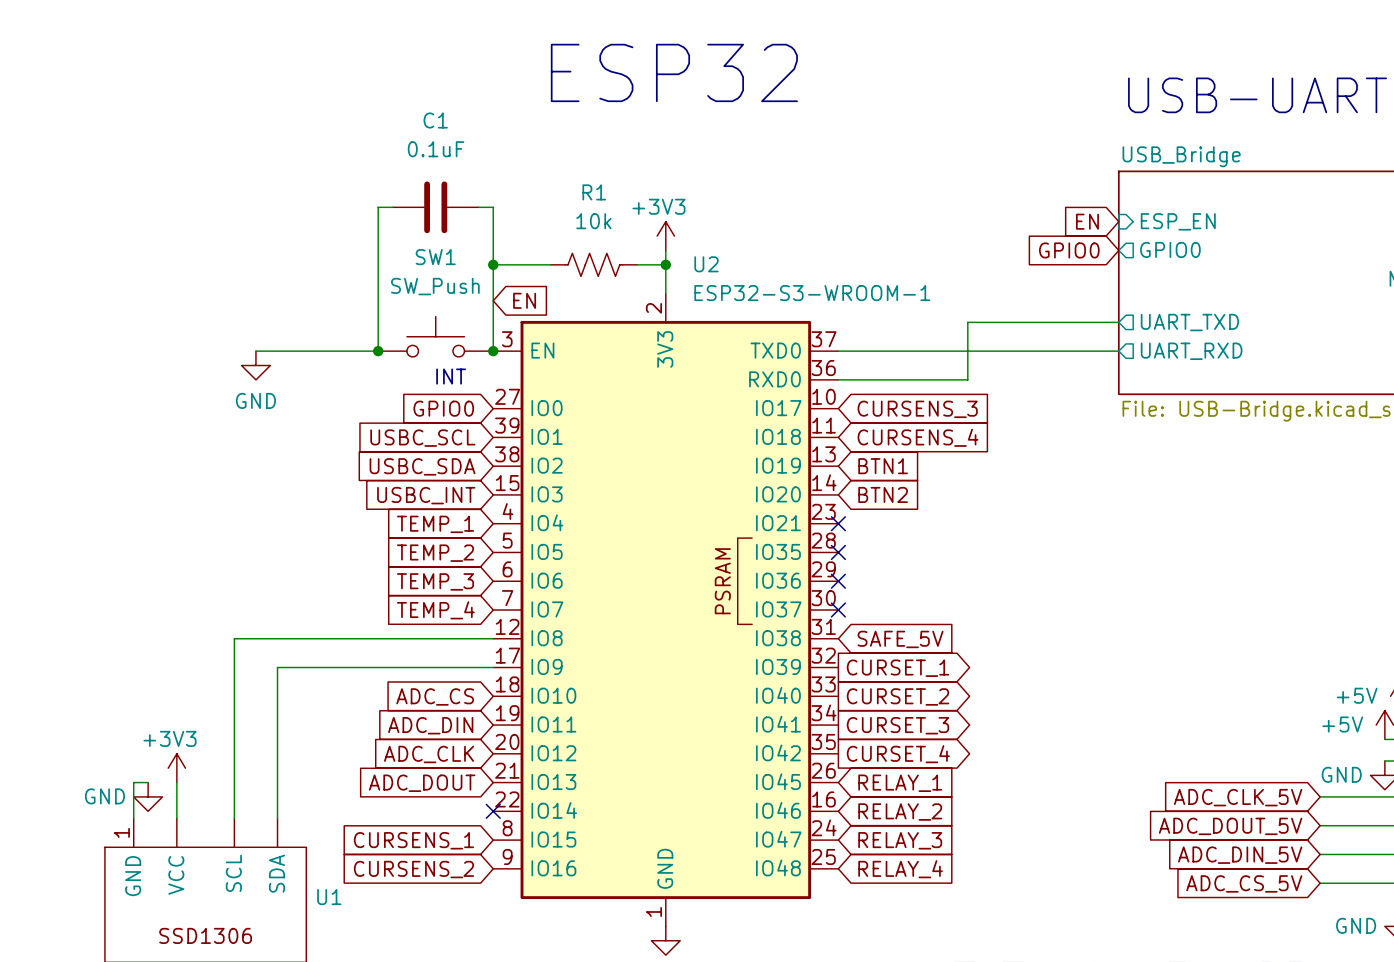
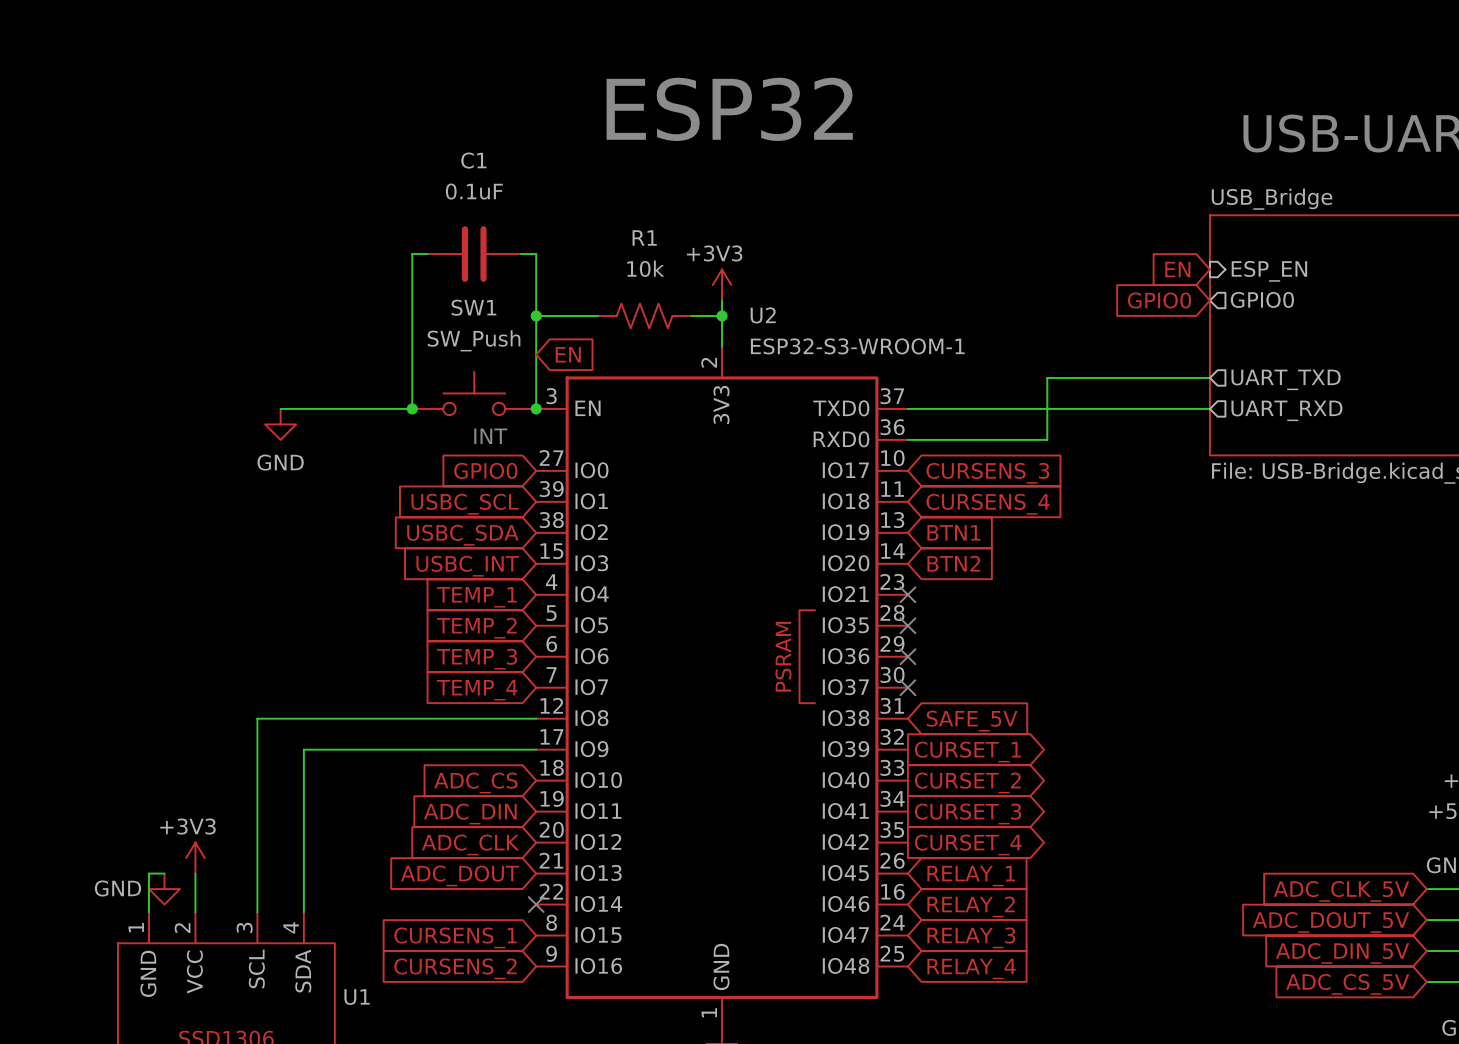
U1 pin number: none -> 4 (291, 927)
U1 pin number: none -> 2 (182, 928)
U1 pin number: none -> 3 (244, 927)

